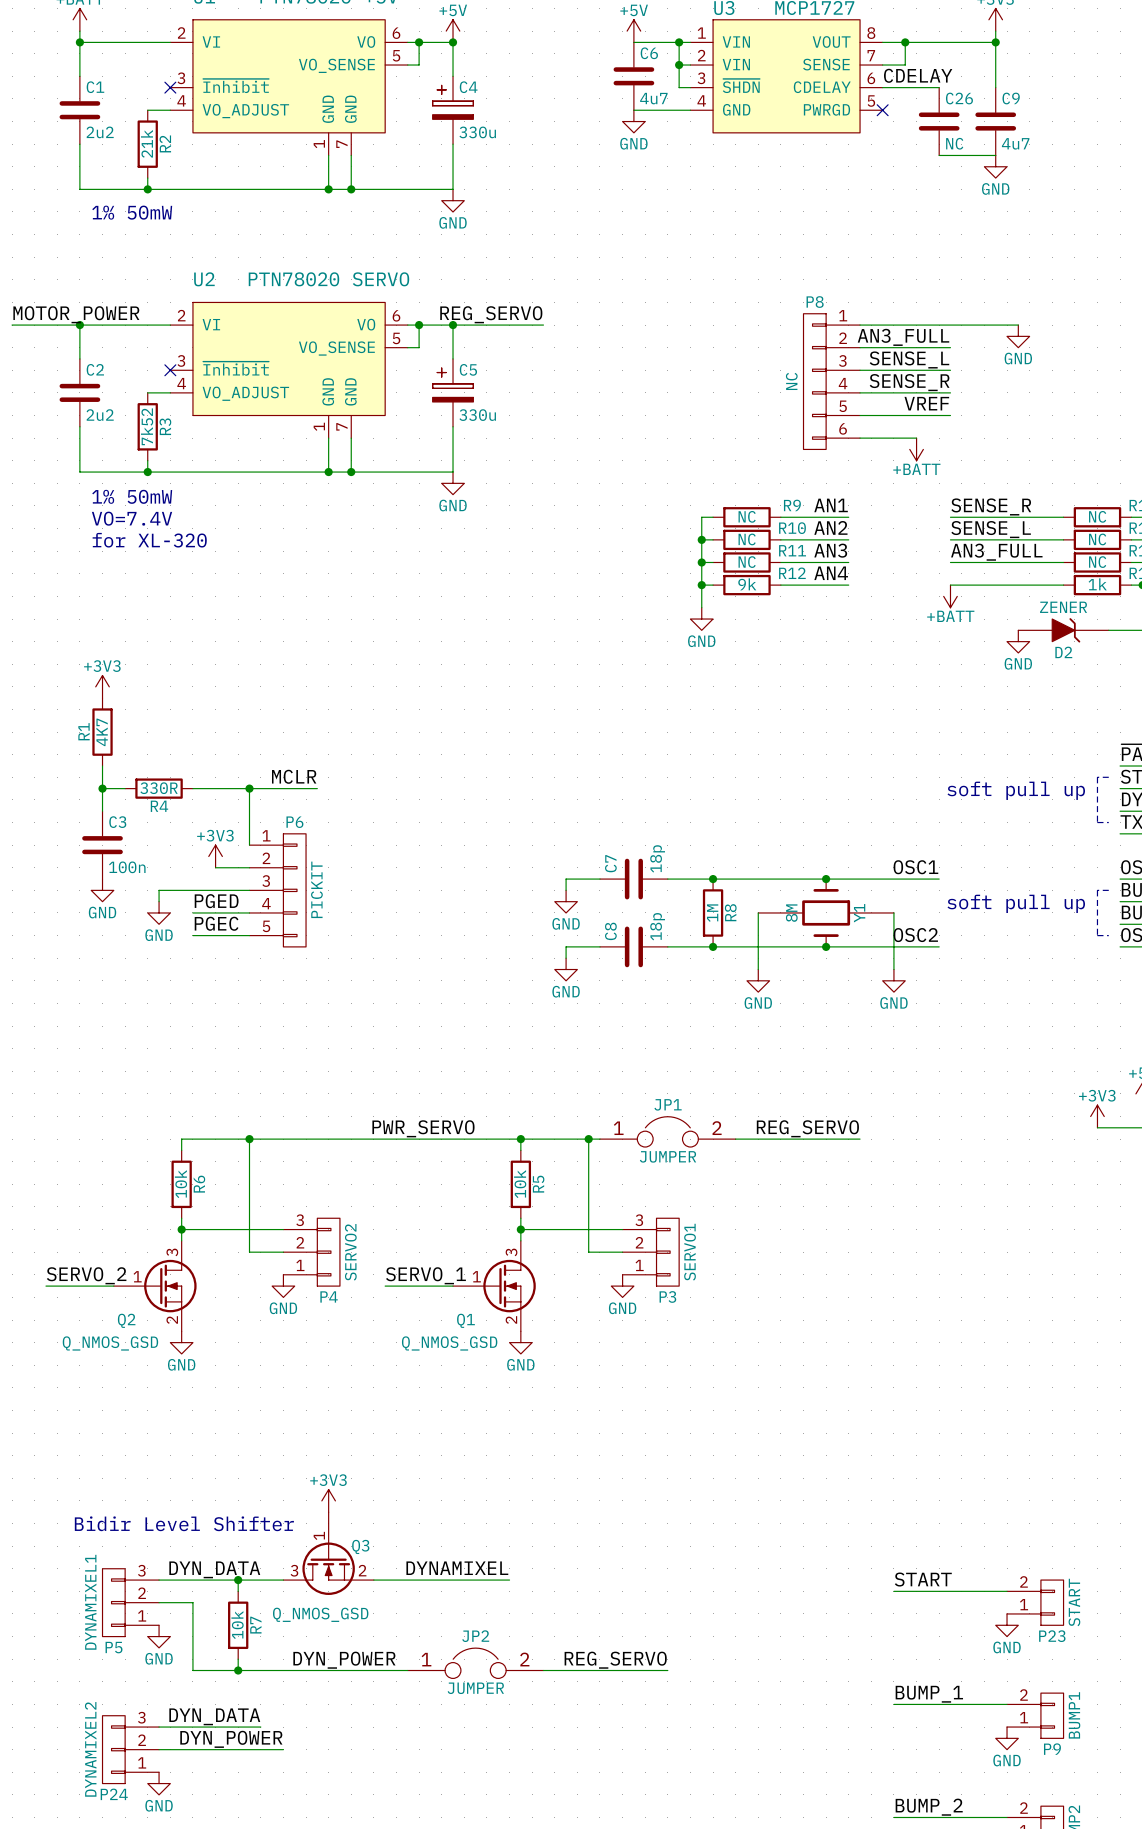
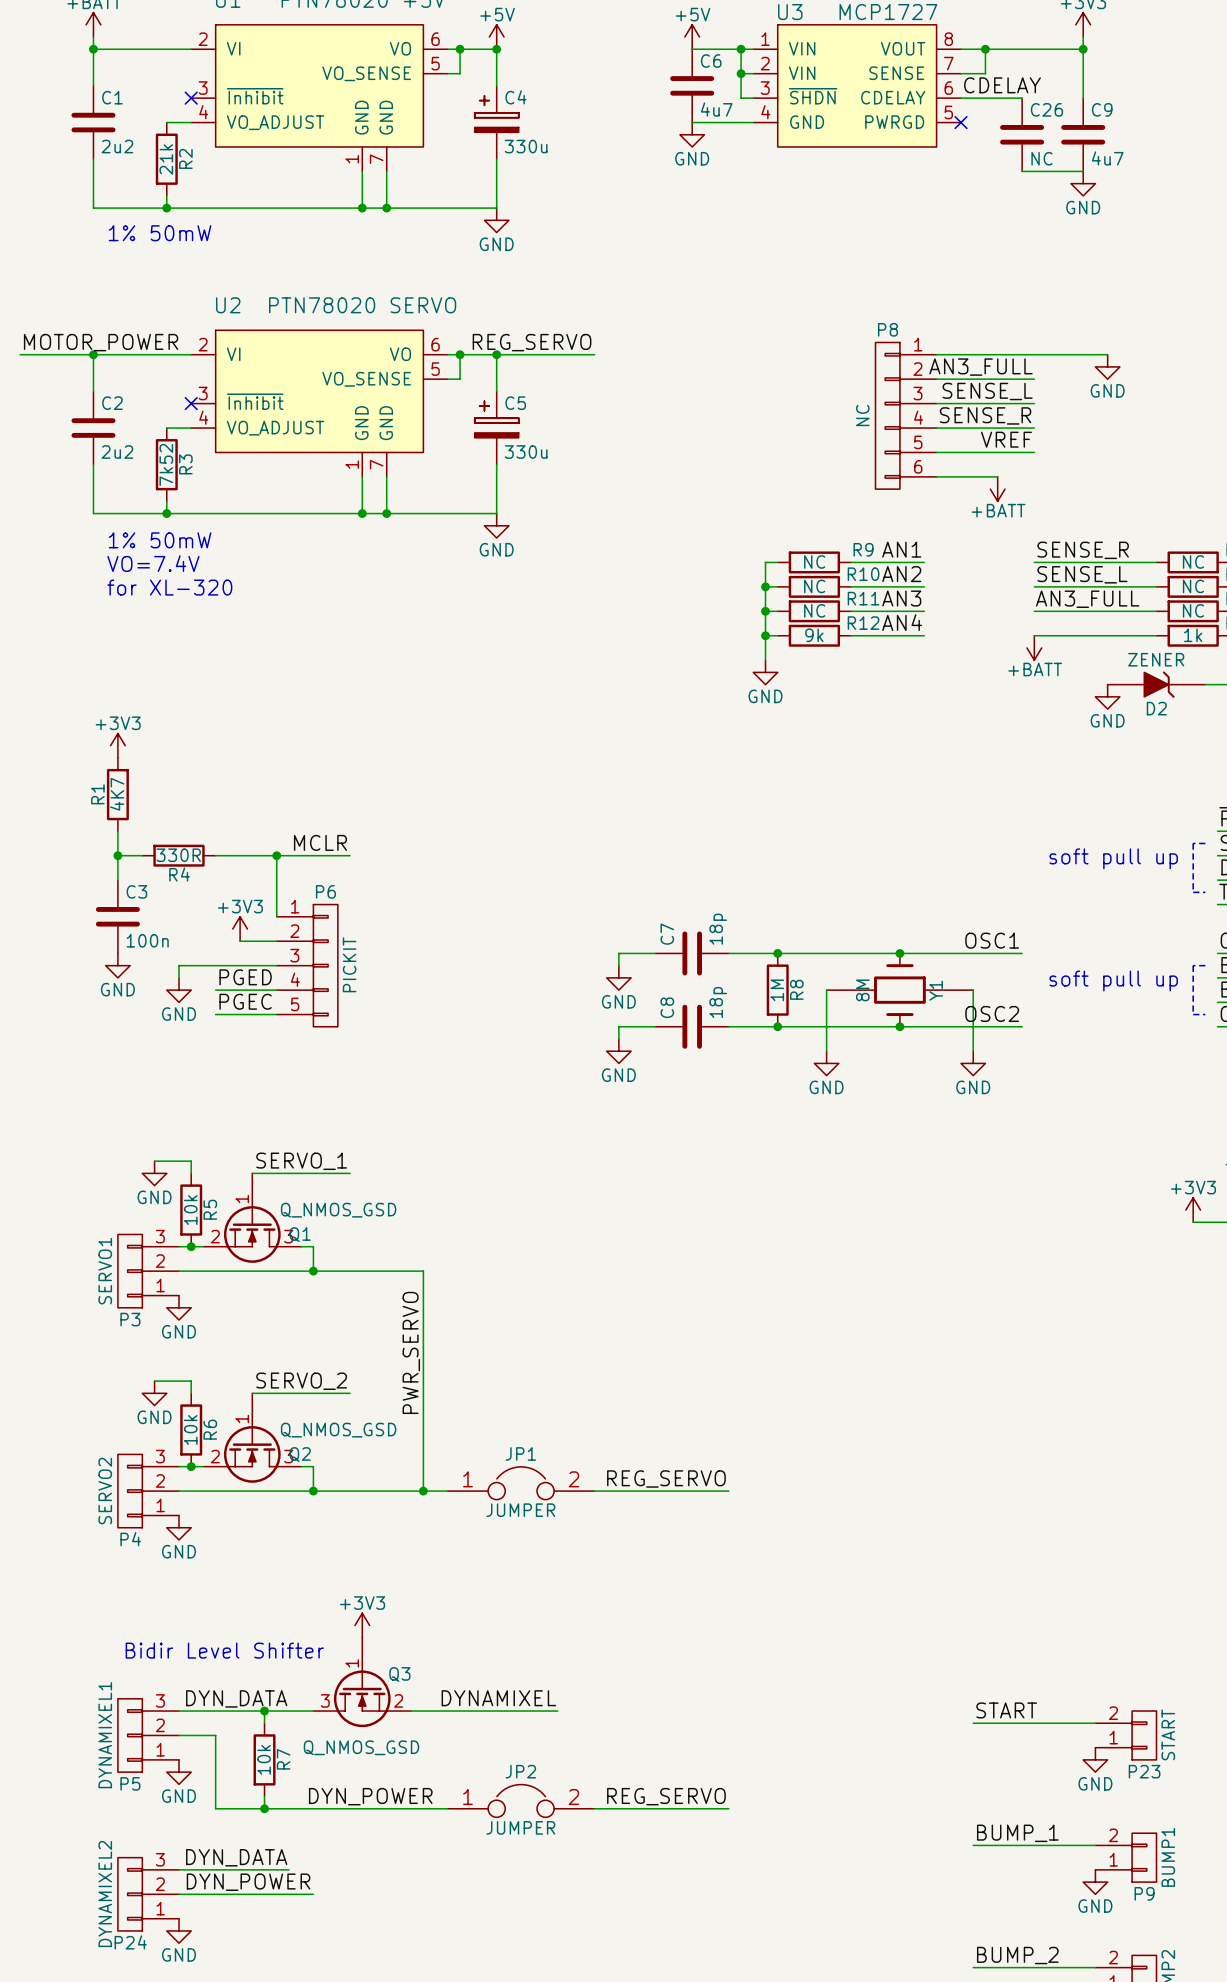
wire: none -> (154, 1161) (191, 1161) (191, 1173)
power symbol: none -> GND (154, 1173)
wire: none -> (252, 1173) (350, 1173)
label rotation: 0° (423, 1128) -> 90° counterclockwise (411, 1352)
label: REG_SERVO (807, 1128) -> none
JP1 position: (667, 1131) -> (521, 1483)
wire: (249, 1139) (249, 1252) (283, 1252) -> none
junction: (249, 1139) -> none
wire: (520, 1139) (520, 1150) -> none
junction: (520, 1139) -> none
wire: (588, 1139) (588, 1252) (622, 1252) -> none
junction: (588, 1139) -> none
wire: (599, 1139) (181, 1139) (181, 1150) -> (179, 1246) (203, 1246)
wire: (735, 1139) (860, 1139) -> none
junction: none -> (191, 1246)
wire: none -> (301, 1246) (313, 1246) (313, 1271)
wire: none -> (179, 1271) (423, 1271) (423, 1491)
junction: none -> (313, 1271)
R6 position: (181, 1184) -> (191, 1429)
R5 position: (520, 1184) -> (191, 1210)
power symbol: none -> GND (179, 1307)
wire: (181, 1218) (181, 1240) -> none
wire: (520, 1218) (520, 1240) -> none
wire: (181, 1229) (283, 1229) -> none
junction: (181, 1229) -> none
wire: (520, 1229) (622, 1229) -> none
junction: (520, 1229) -> none
P4 position: (311, 1252) -> (148, 1491)
P4 flip: as is (328, 1252) -> left-right (130, 1491)
P3 position: (650, 1252) -> (148, 1271)
P3 flip: as is (667, 1252) -> left-right (130, 1271)
wire: none -> (154, 1381) (191, 1381) (191, 1393)
label: SERVO_2 (86, 1275) -> none
label: none -> SERVO_2 (301, 1381)
label position: SERVO_1 (425, 1275) -> SERVO_1 (301, 1161)
wire: (45, 1286) (113, 1286) -> none
power symbol: none -> GND (154, 1393)
Q2 position: (155, 1286) -> (252, 1438)
Q2 rotation: 0° (170, 1286) -> 90° clockwise (252, 1454)
wire: none -> (252, 1393) (350, 1393)
power symbol: GND (283, 1286) -> none
wire: (385, 1286) (453, 1286) -> none
Q1 position: (494, 1286) -> (252, 1218)
Q1 rotation: 0° (509, 1286) -> 90° clockwise (252, 1234)
power symbol: GND (622, 1286) -> none
Q2 name position: Q2 (126, 1320) -> Q2 (300, 1454)
Q1 name position: Q1 (465, 1320) -> Q1 (300, 1234)
power symbol: GND (181, 1342) -> none
power symbol: GND (520, 1342) -> none
Q2 value position: Q_NMOS_GSD (110, 1343) -> Q_NMOS_GSD (338, 1430)
Q1 value position: Q_NMOS_GSD (449, 1343) -> Q_NMOS_GSD (338, 1210)
wire: none -> (179, 1466) (203, 1466)
junction: none -> (191, 1466)
wire: none -> (301, 1466) (313, 1466) (313, 1491)
label: none -> REG_SERVO (666, 1478)
wire: none -> (179, 1491) (447, 1491)
junction: none -> (313, 1491)
junction: none -> (423, 1491)
wire: none -> (594, 1491) (728, 1491)
power symbol: none -> GND (179, 1527)

